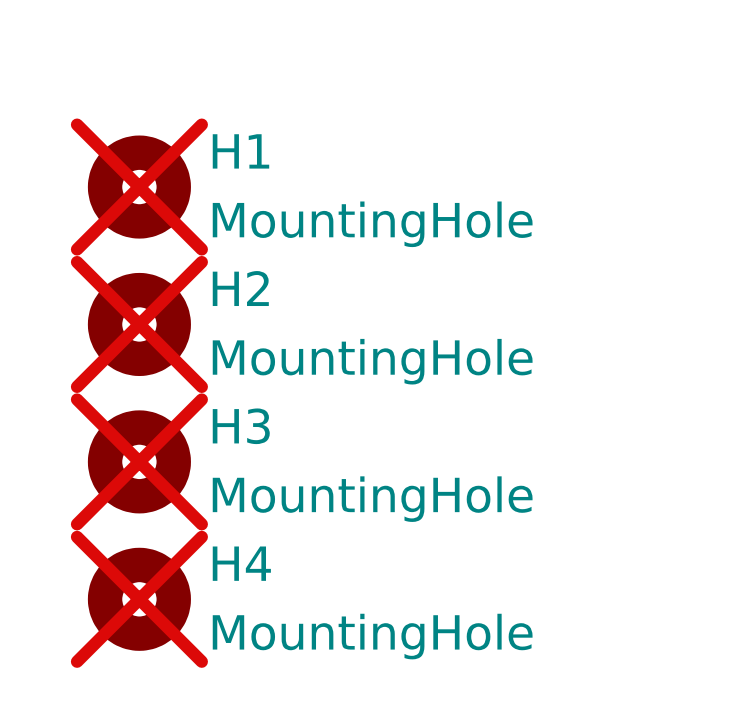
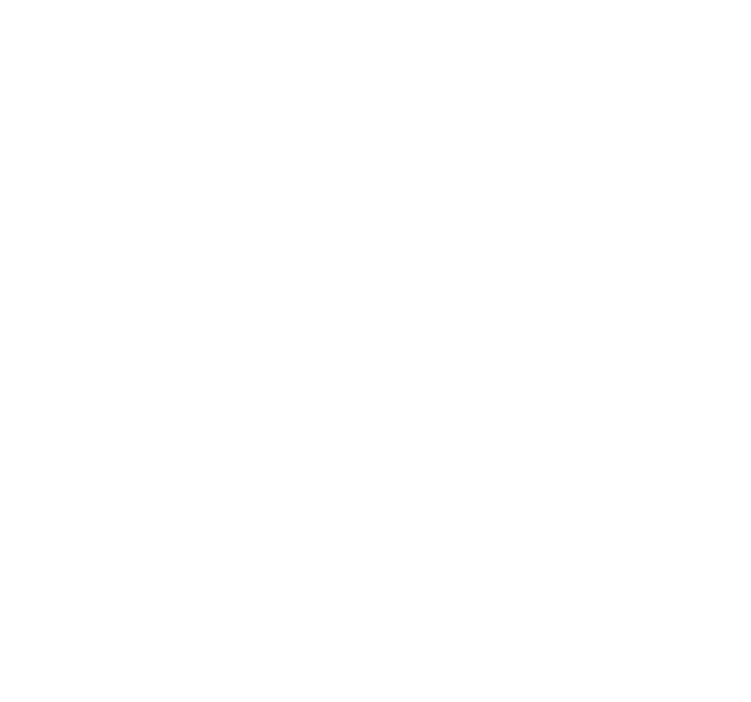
H1: MountingHole (139, 187) -> none
H2: MountingHole (139, 324) -> none
H3: MountingHole (139, 461) -> none
H4: MountingHole (139, 599) -> none

